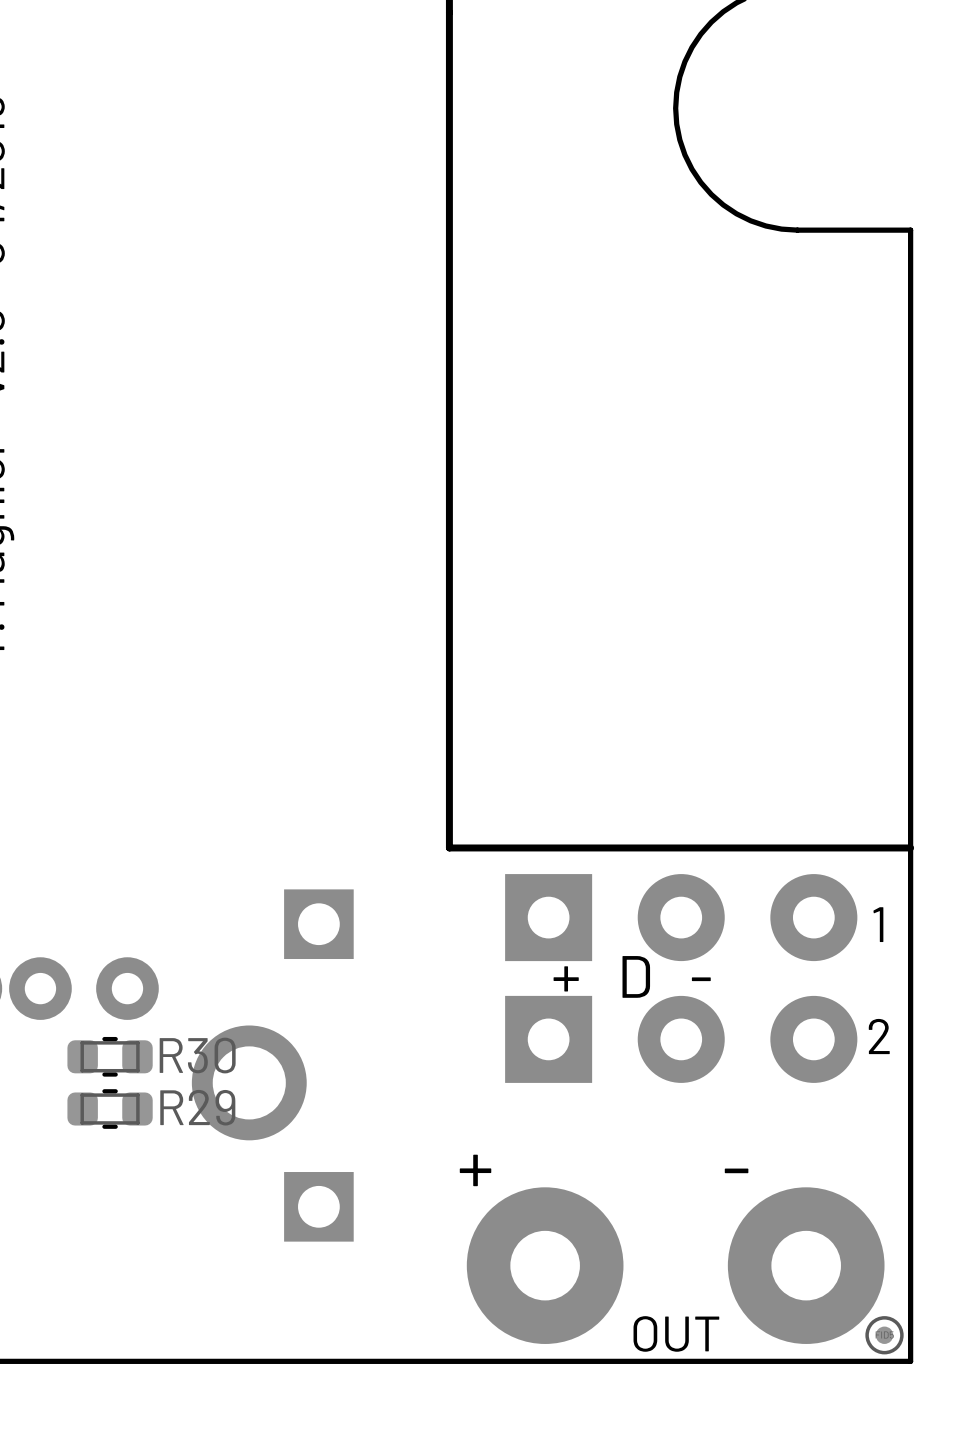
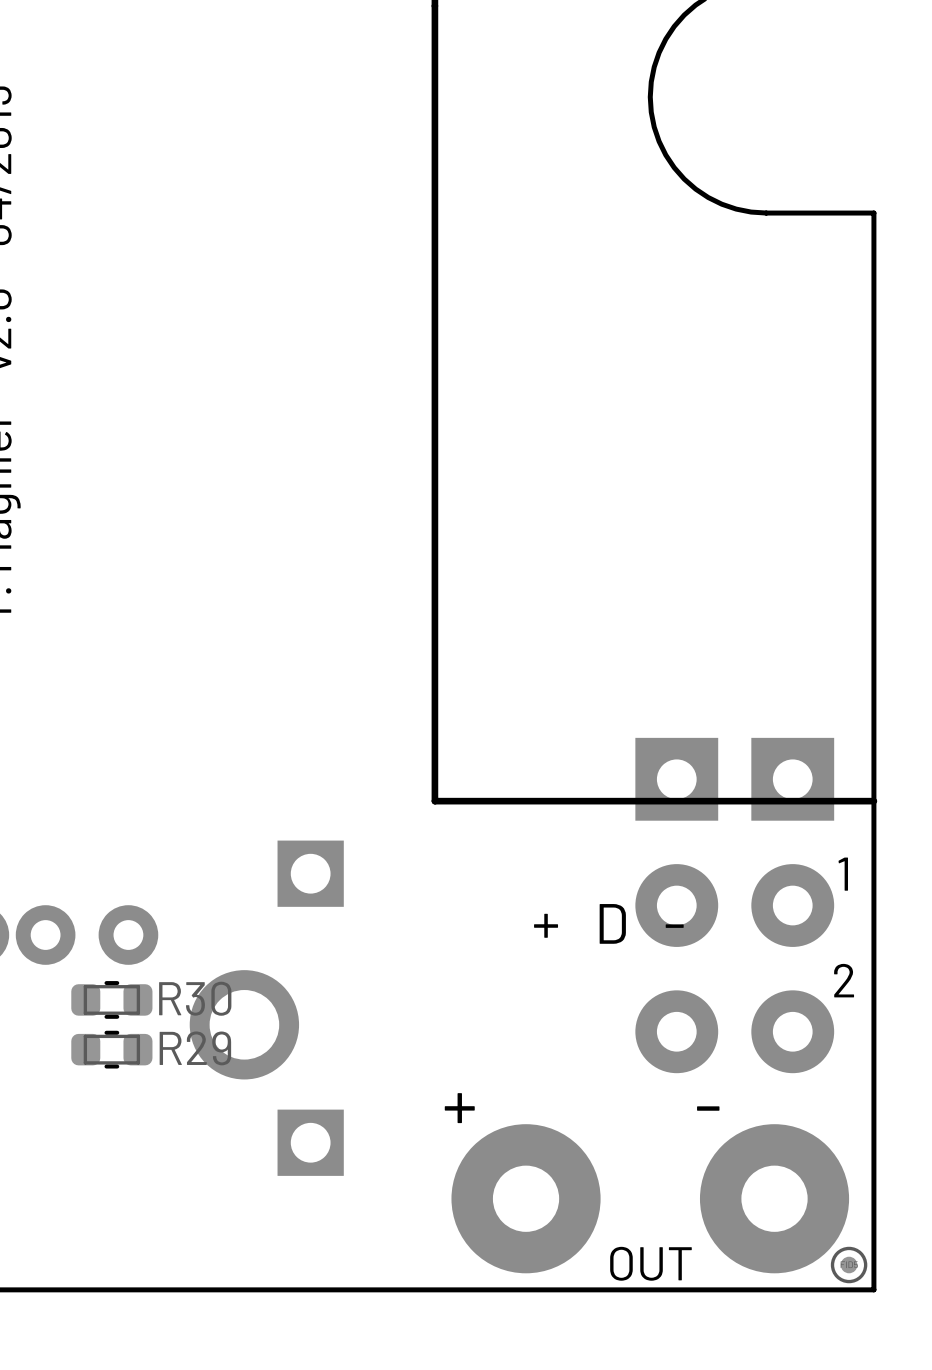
part: (681, 917) -> none
part: none -> (676, 905)
part: none -> (792, 905)
part: (681, 1039) -> none

